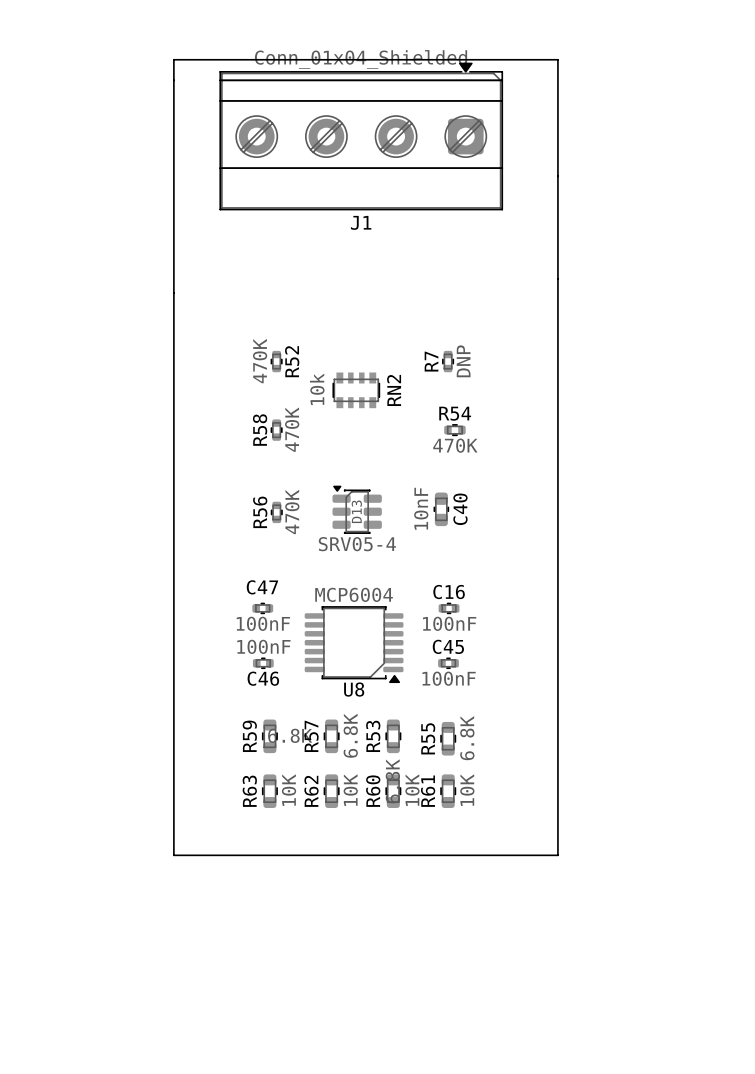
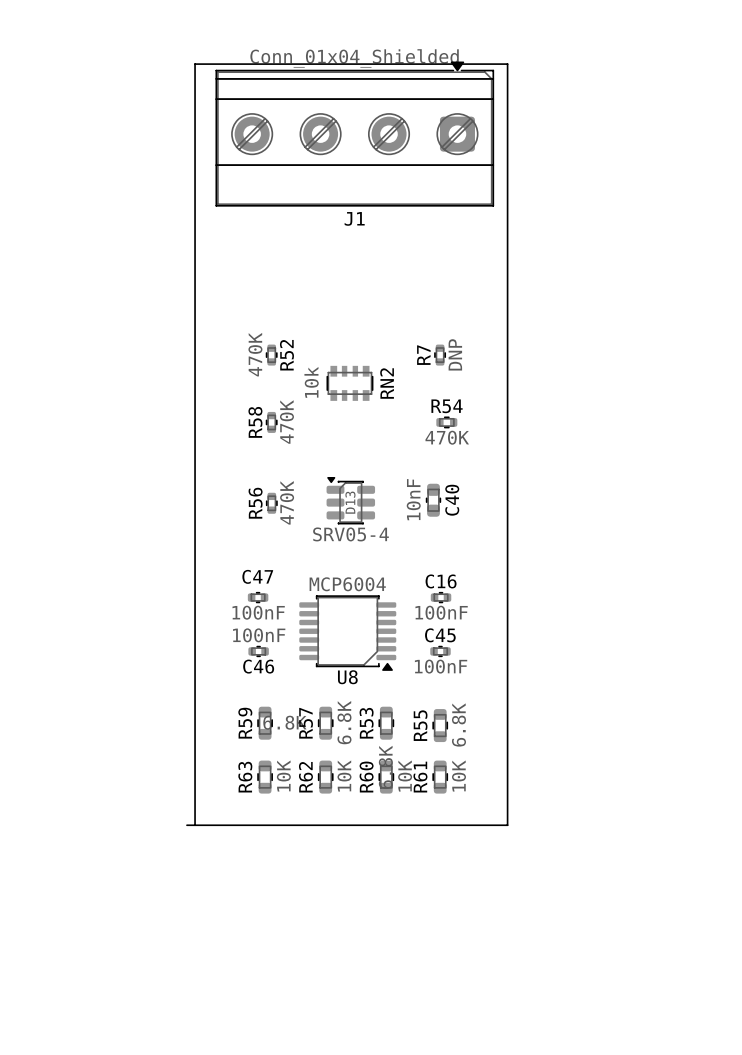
board edge: (173, 59) (173, 855) (557, 855) (557, 59) (173, 59) -> none
board edge: none -> (186, 825) (507, 825) (507, 64) (195, 64) (195, 825)

